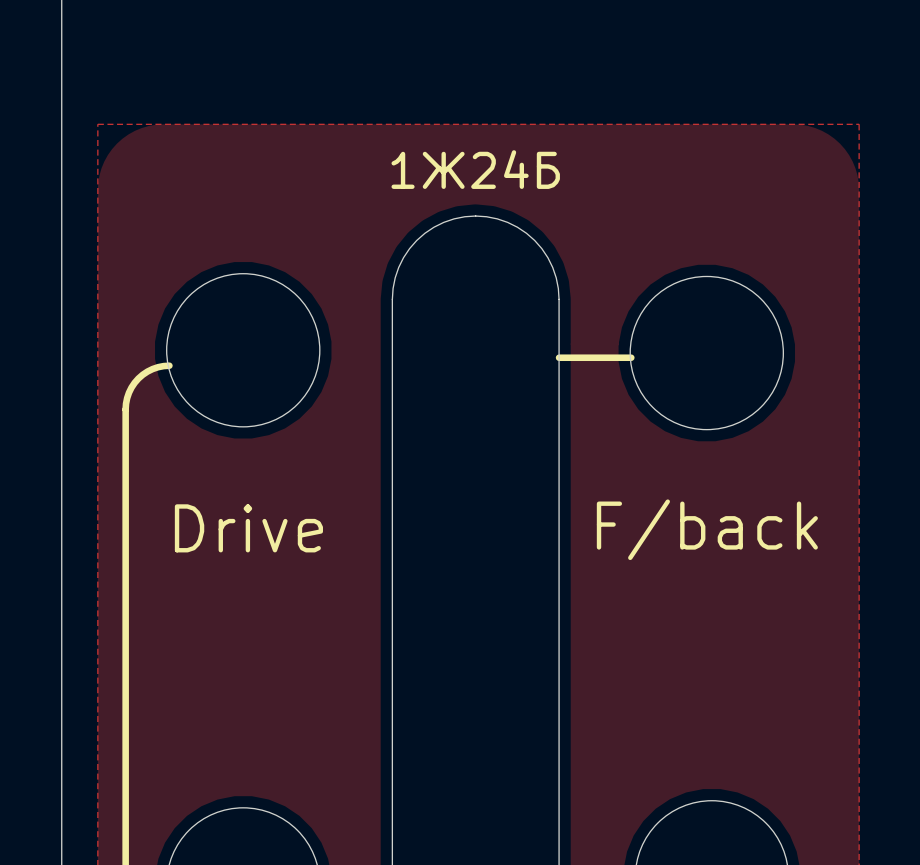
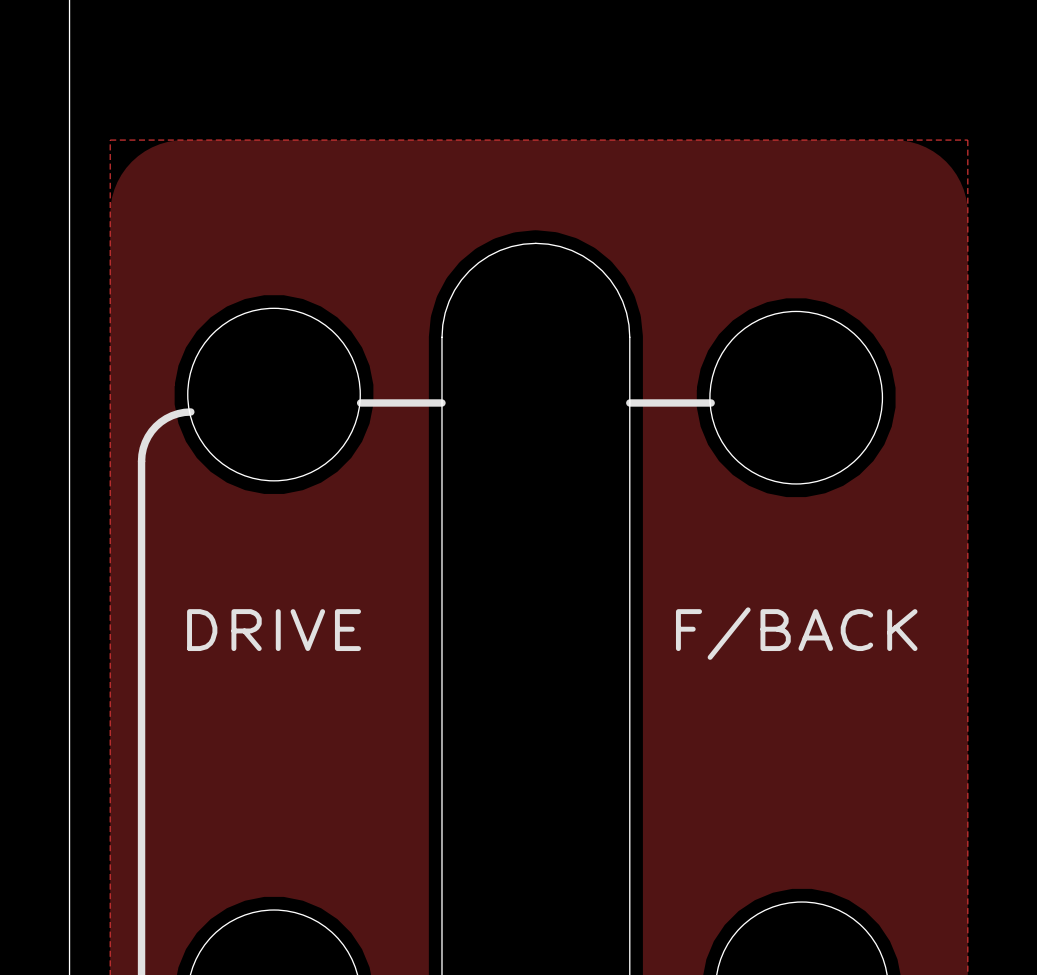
text: 1Ж24Б (475, 169) -> none
line: none -> (360, 402) (441, 402)
text: Drive (248, 528) -> none
text: F/back (707, 529) -> none
text: none -> DRIVE (274, 630)
text: none -> F/BACK (796, 633)

